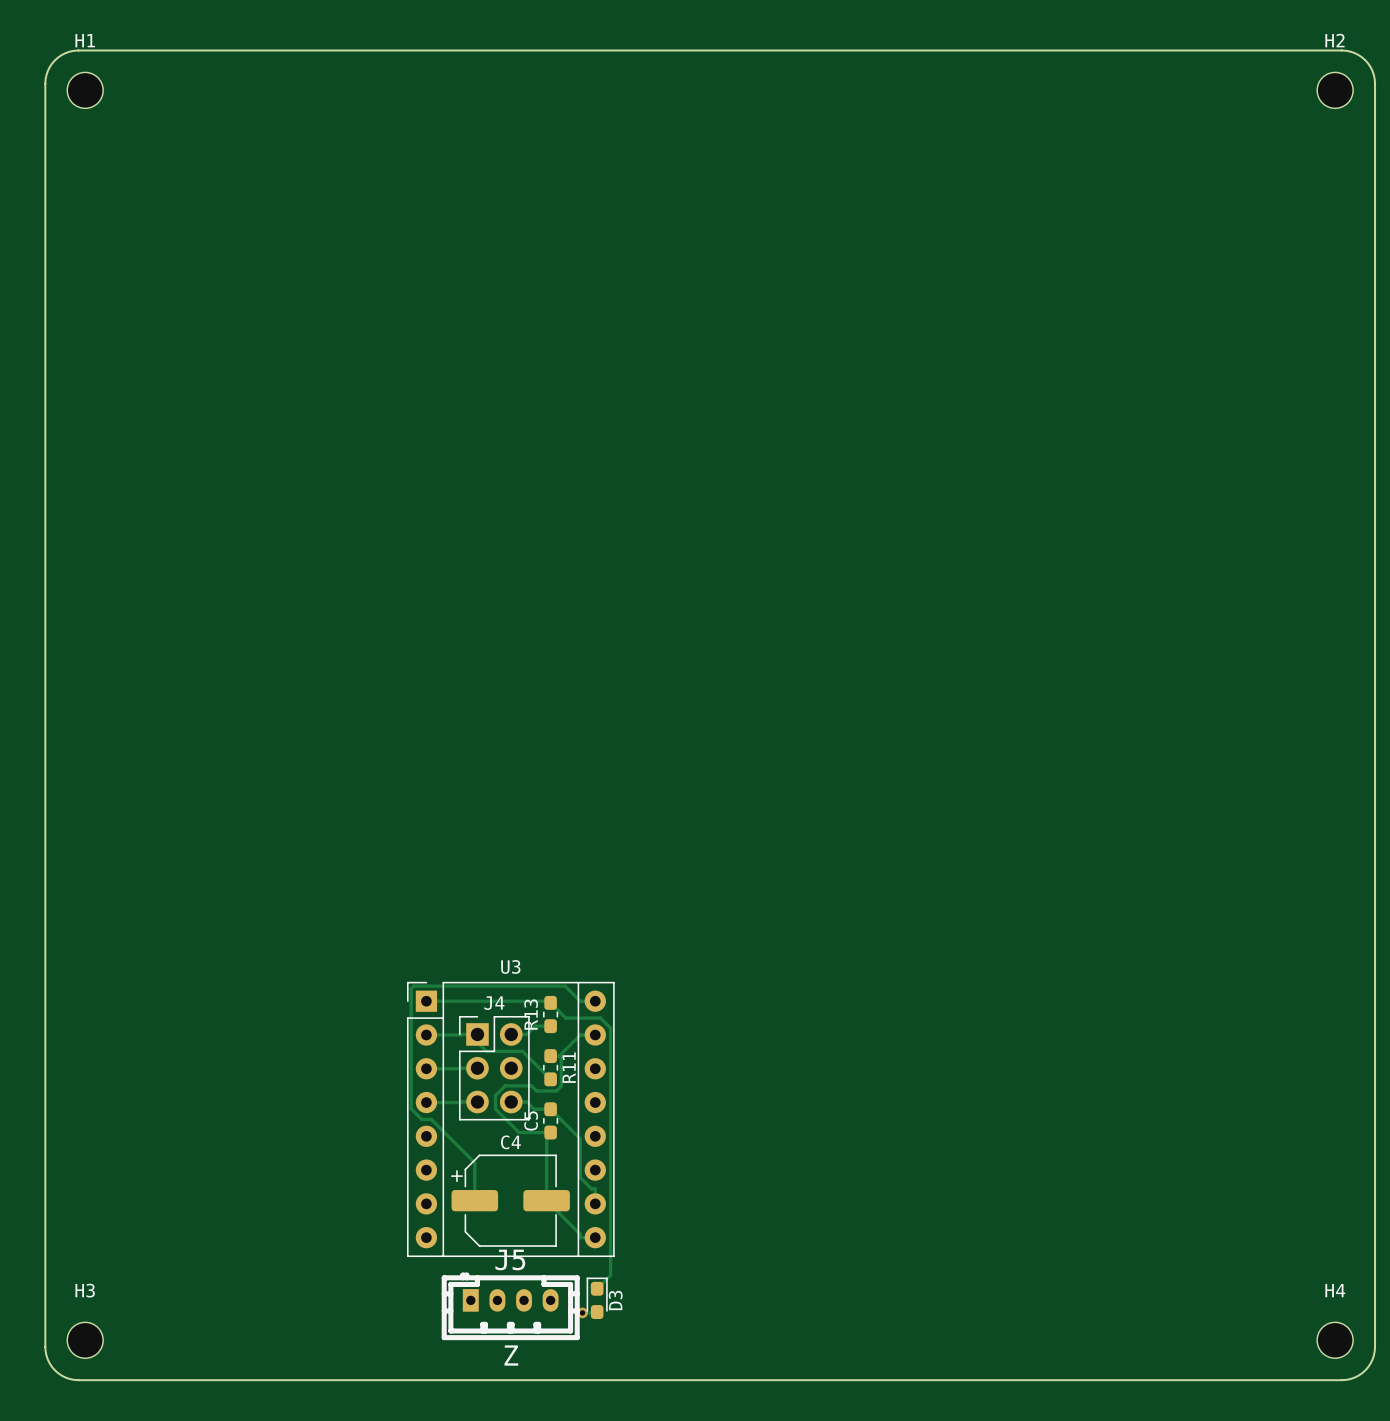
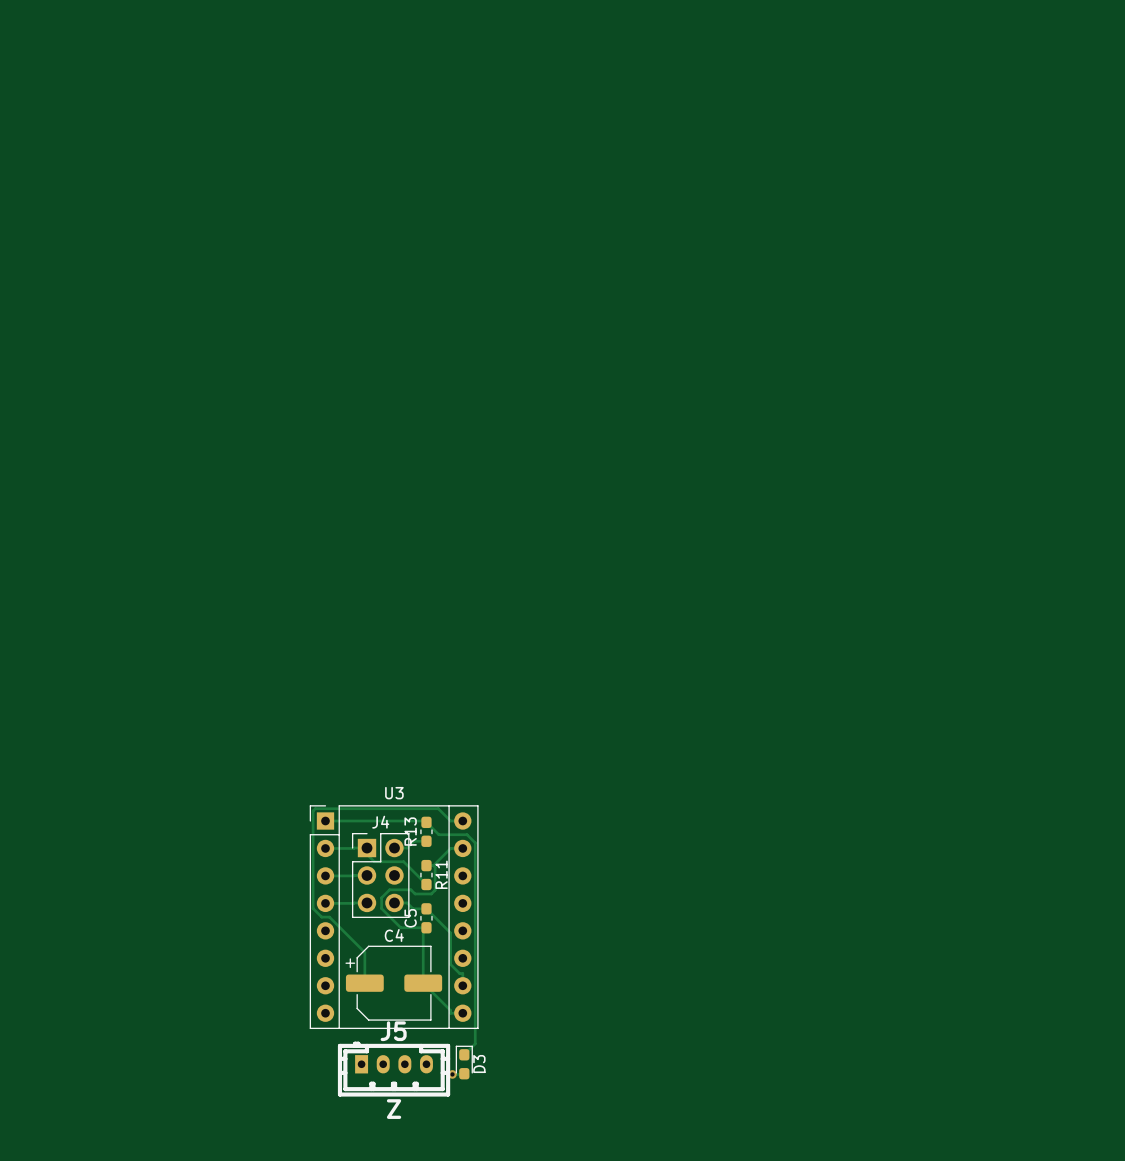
board edge: (78, 50) (1341, 50) (1354, 53) (1365, 60) (1372, 71) (1375, 83) (1375, 1346) (1372, 1359) (1365, 1370) (1354, 1377) (1341, 1380) (78, 1380) (65, 1377) (55, 1370) (47, 1359) (45, 1346) (45, 83) (47, 71) (55, 60) (65, 53) (78, 50) -> none
H1: (85, 90) -> none
H2: (1335, 90) -> none
H3: (85, 1340) -> none
H4: (1335, 1340) -> none

